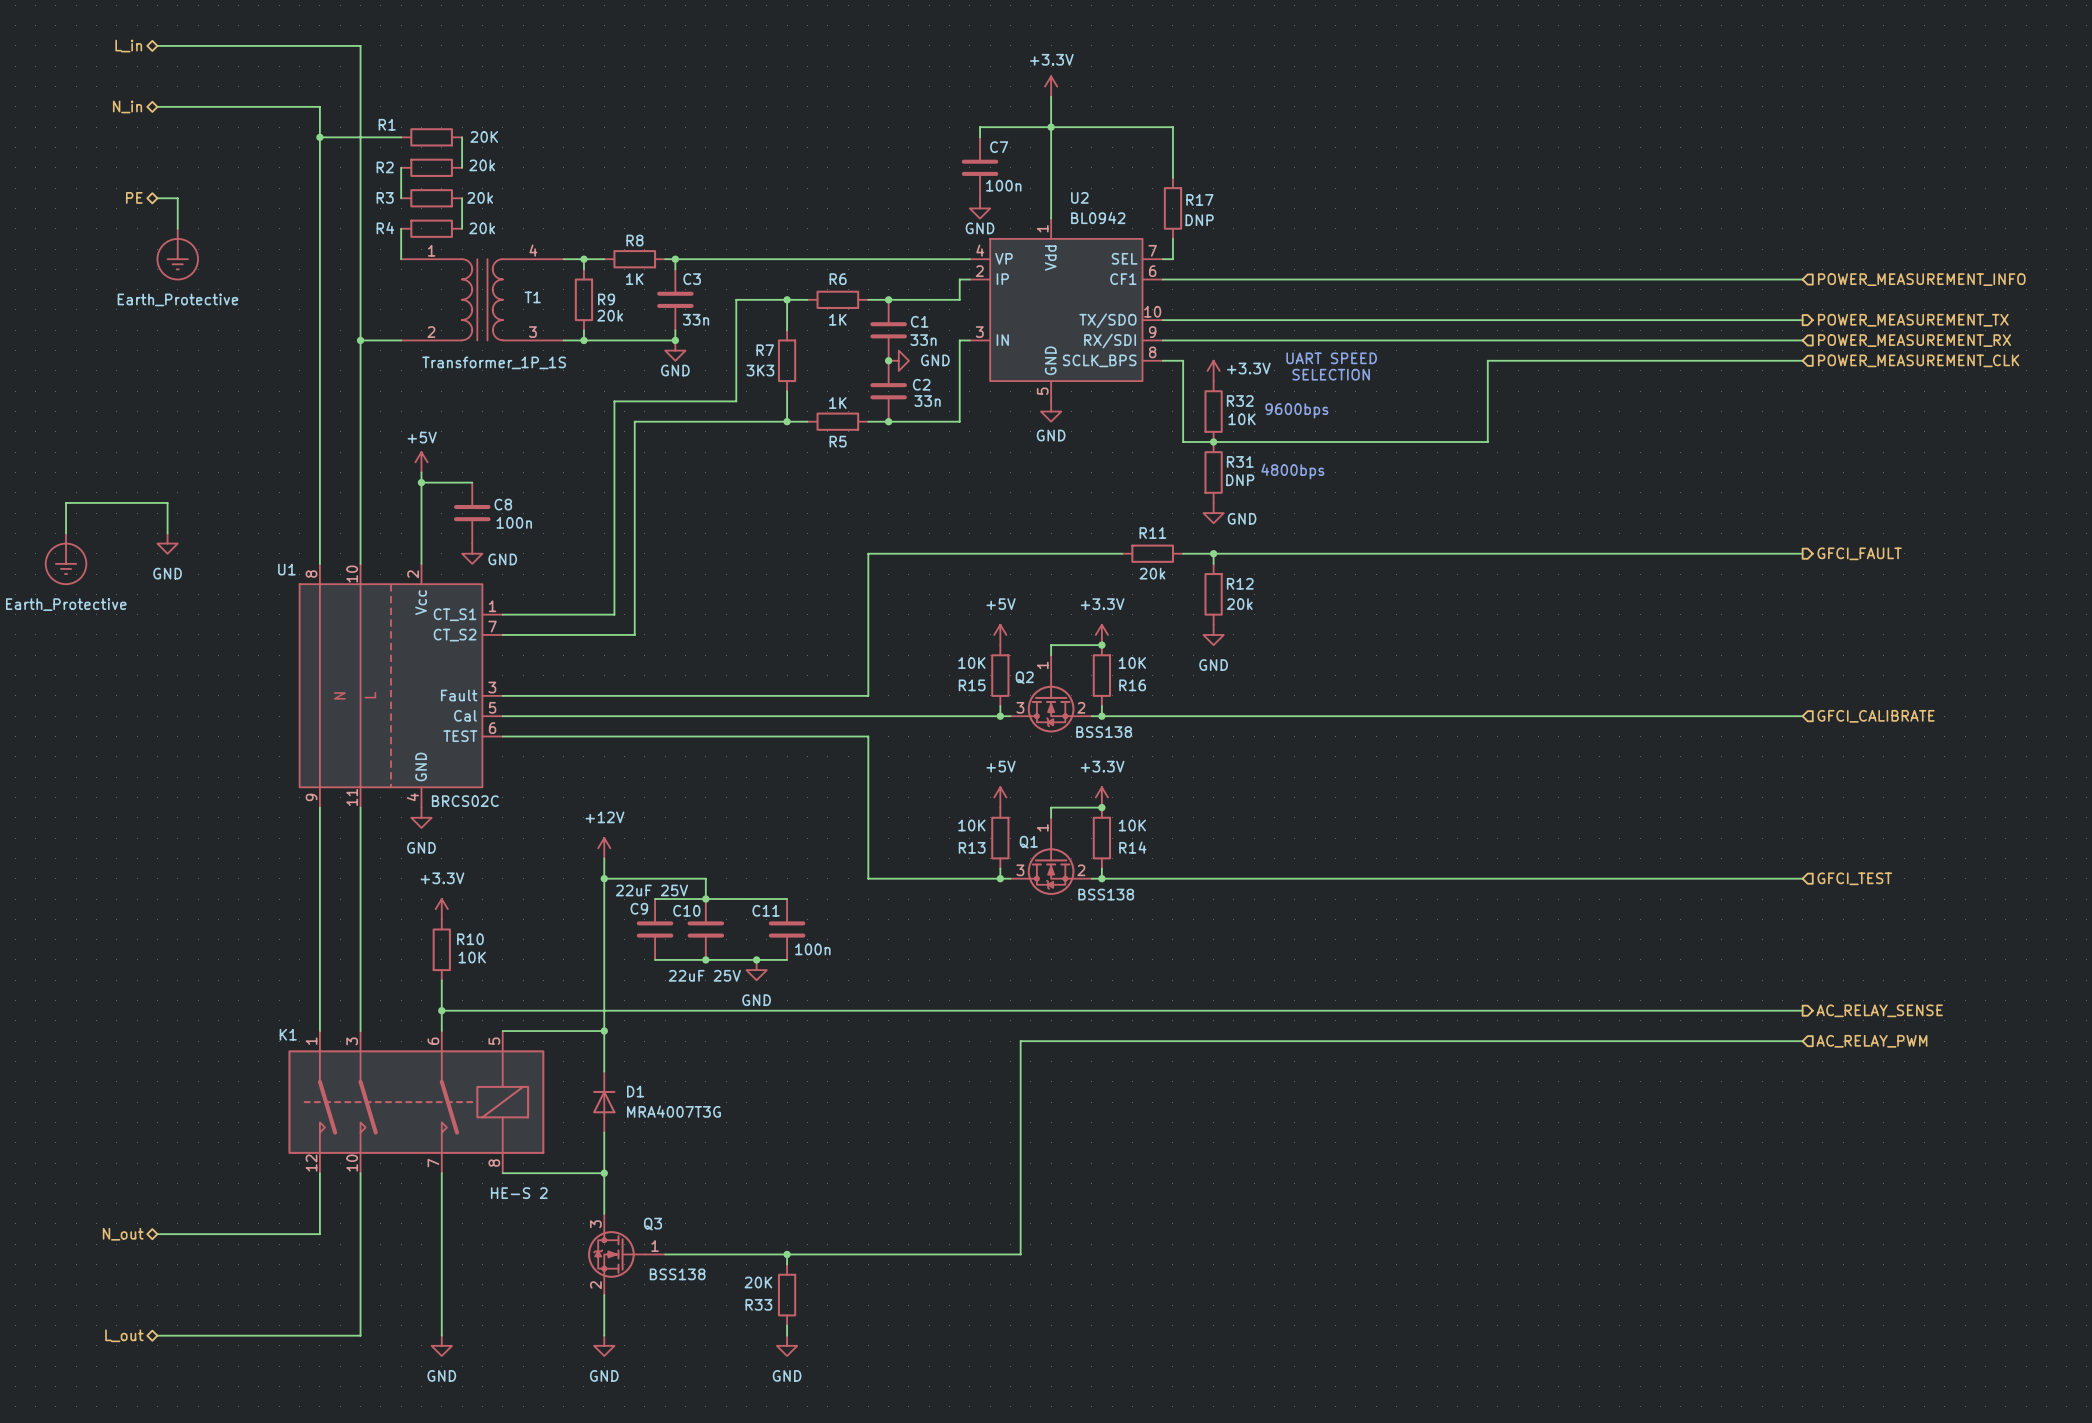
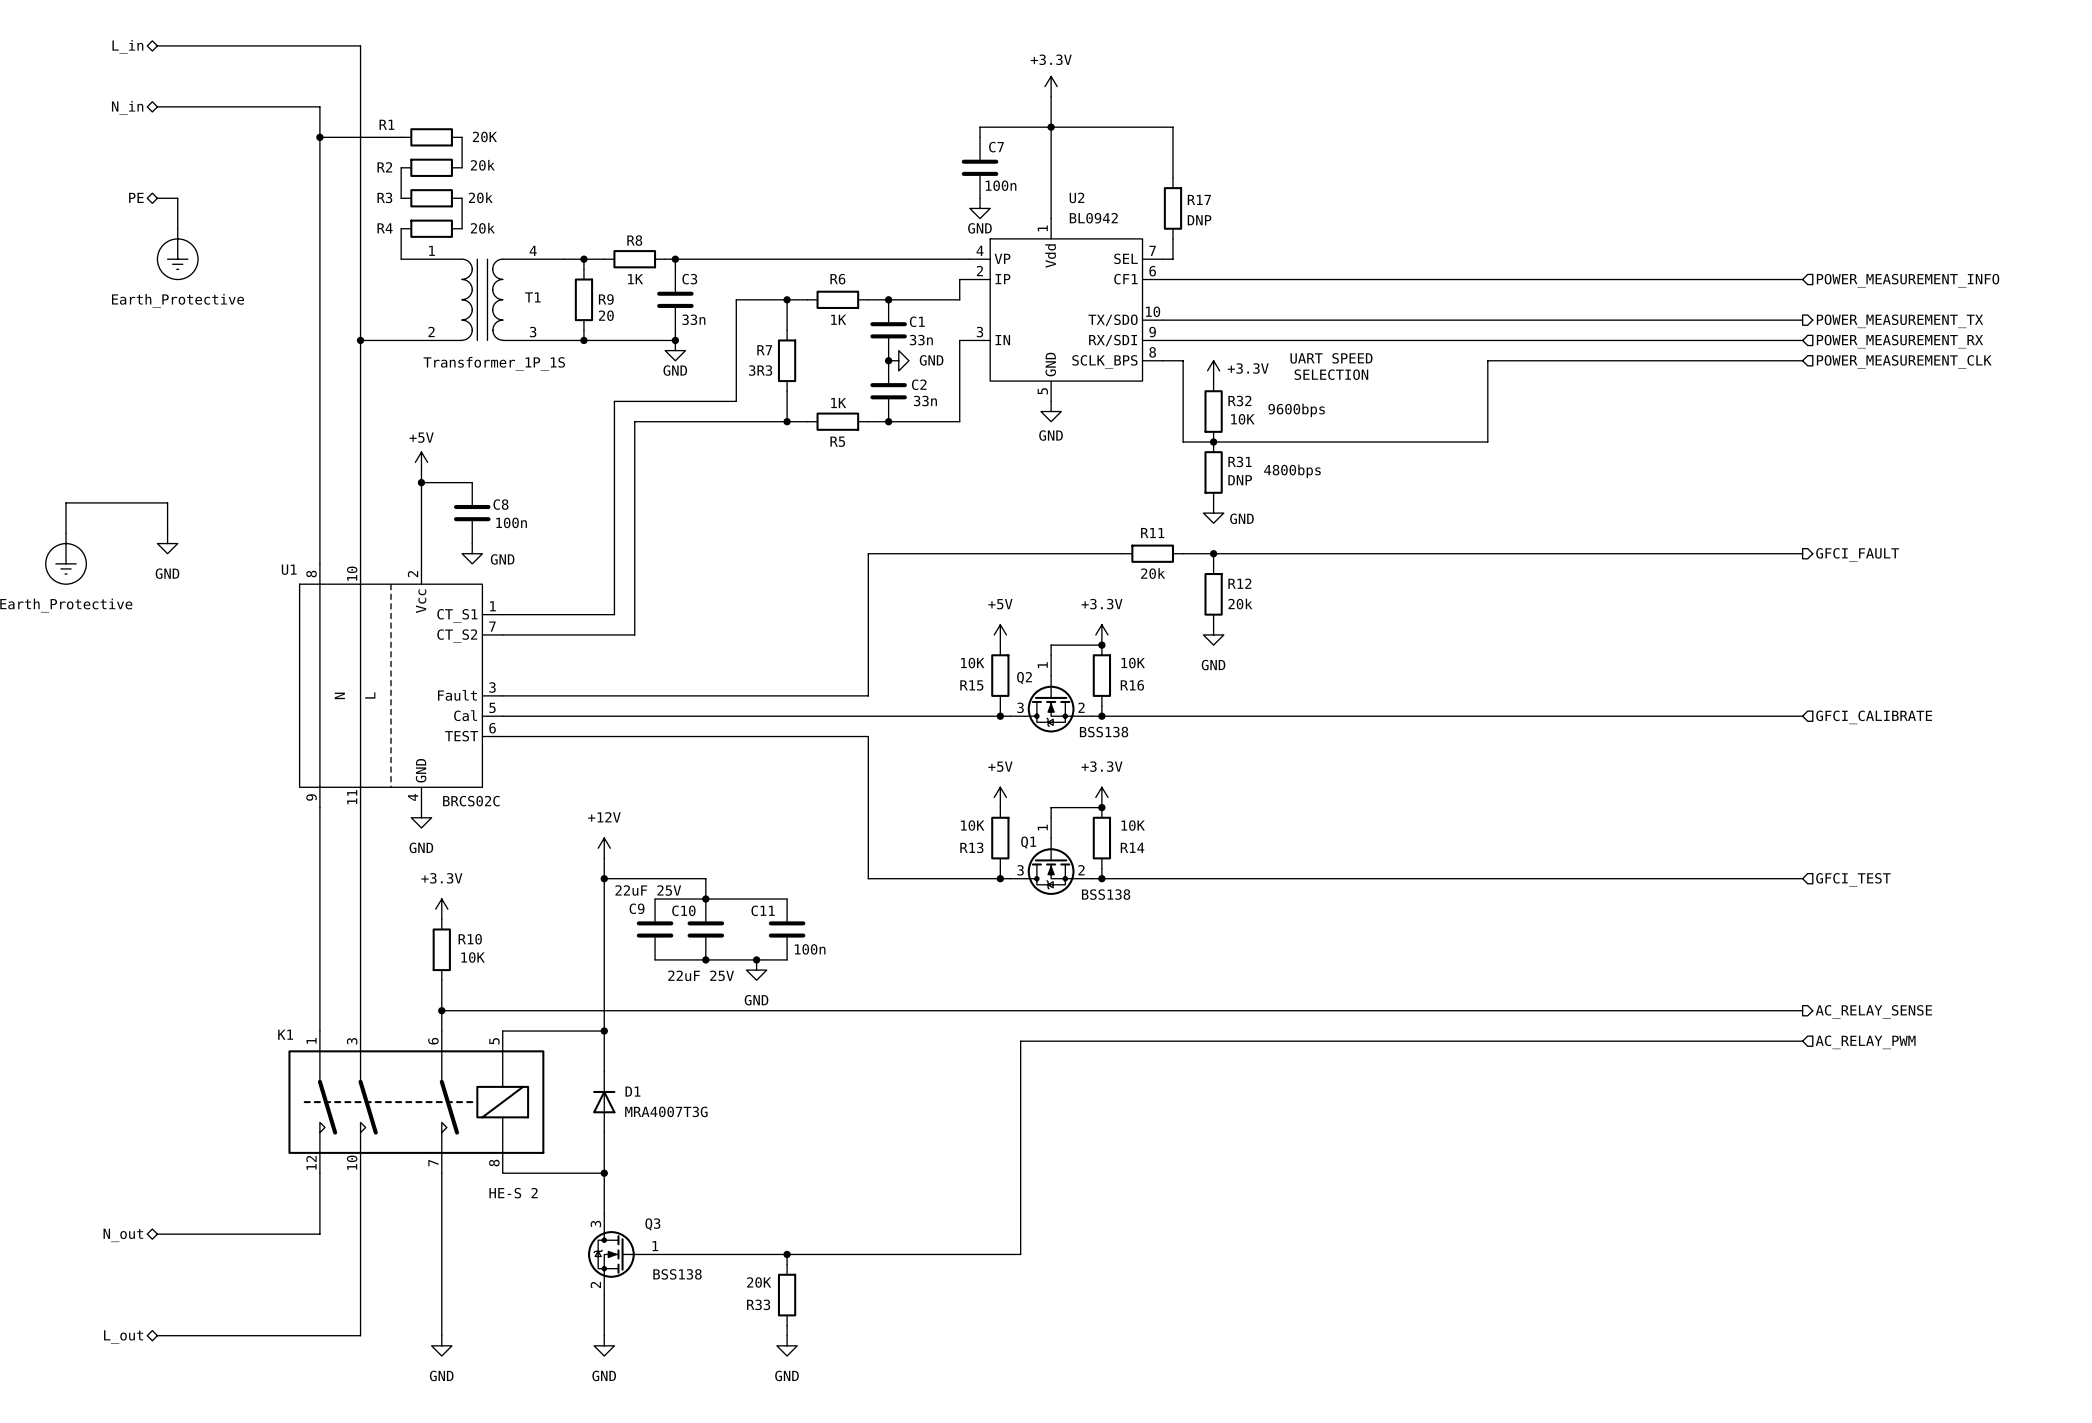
R9 value: 20k (610, 315) -> 20 (606, 315)
R7 value: 3K3 (760, 370) -> 3R3 (760, 370)

